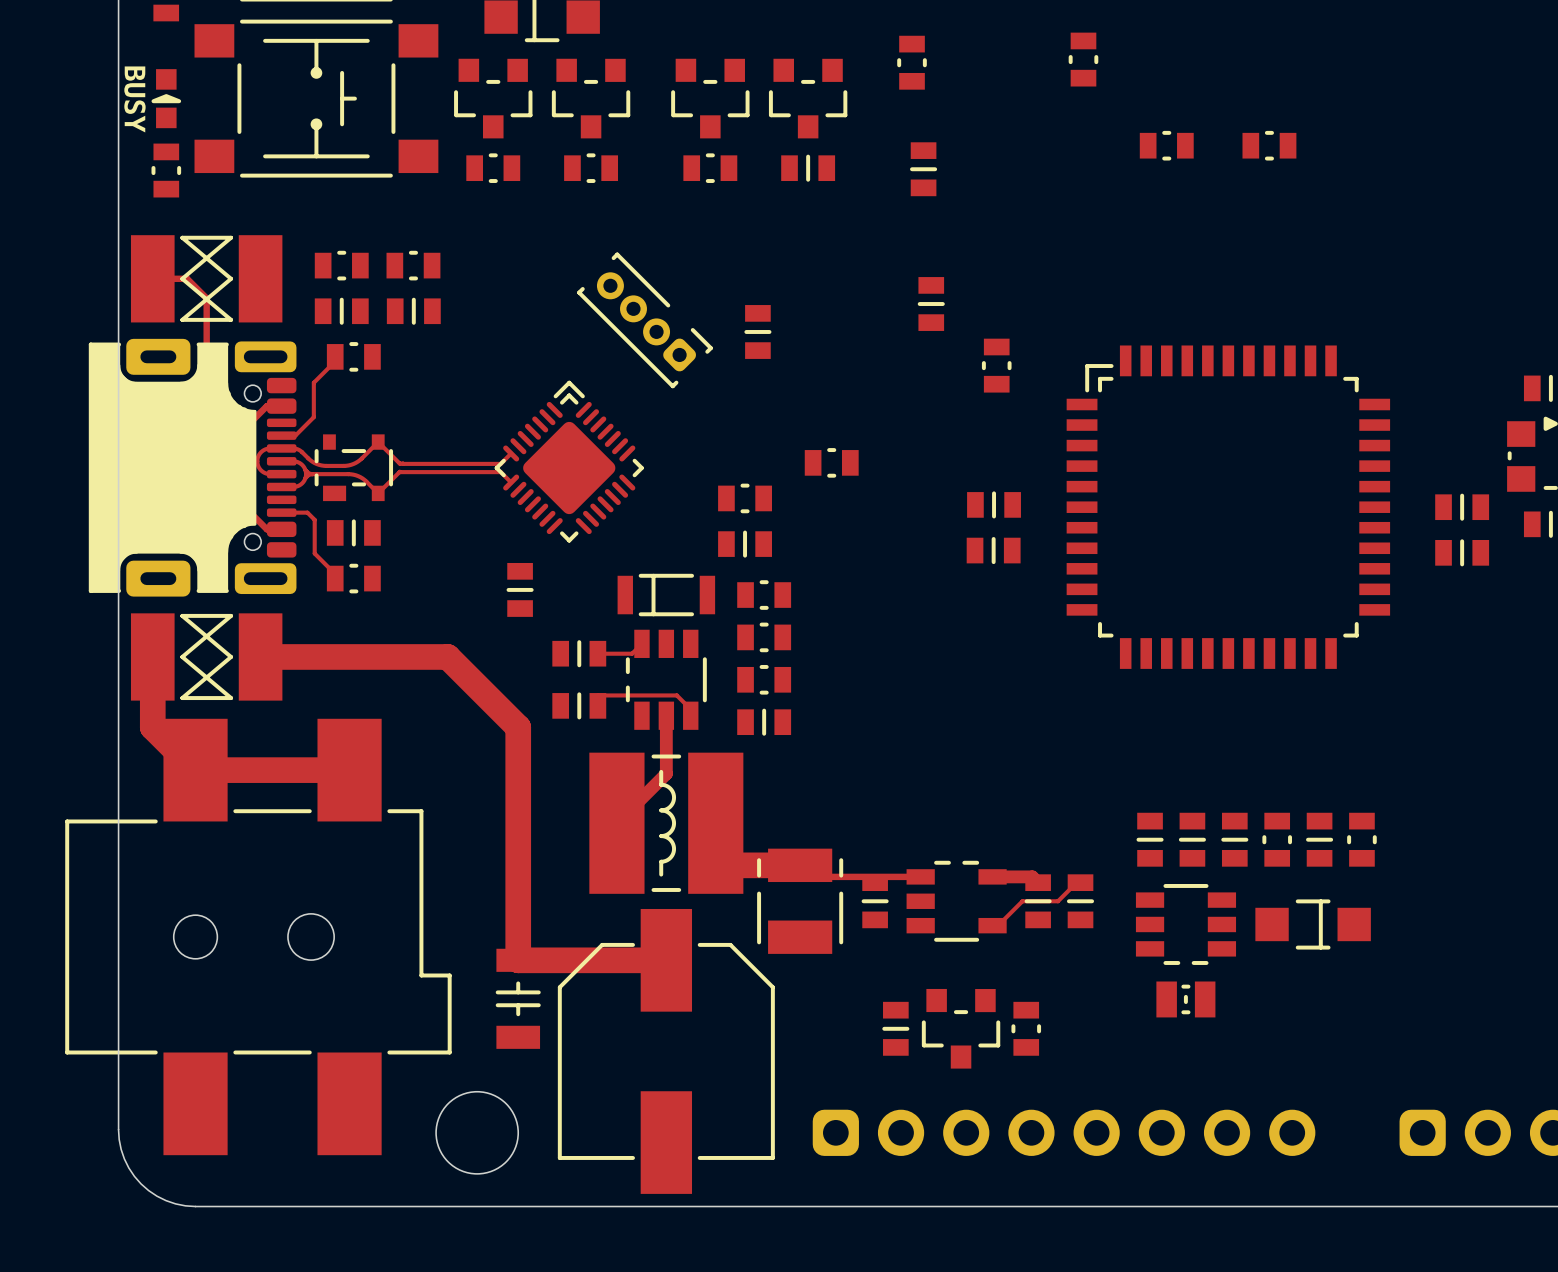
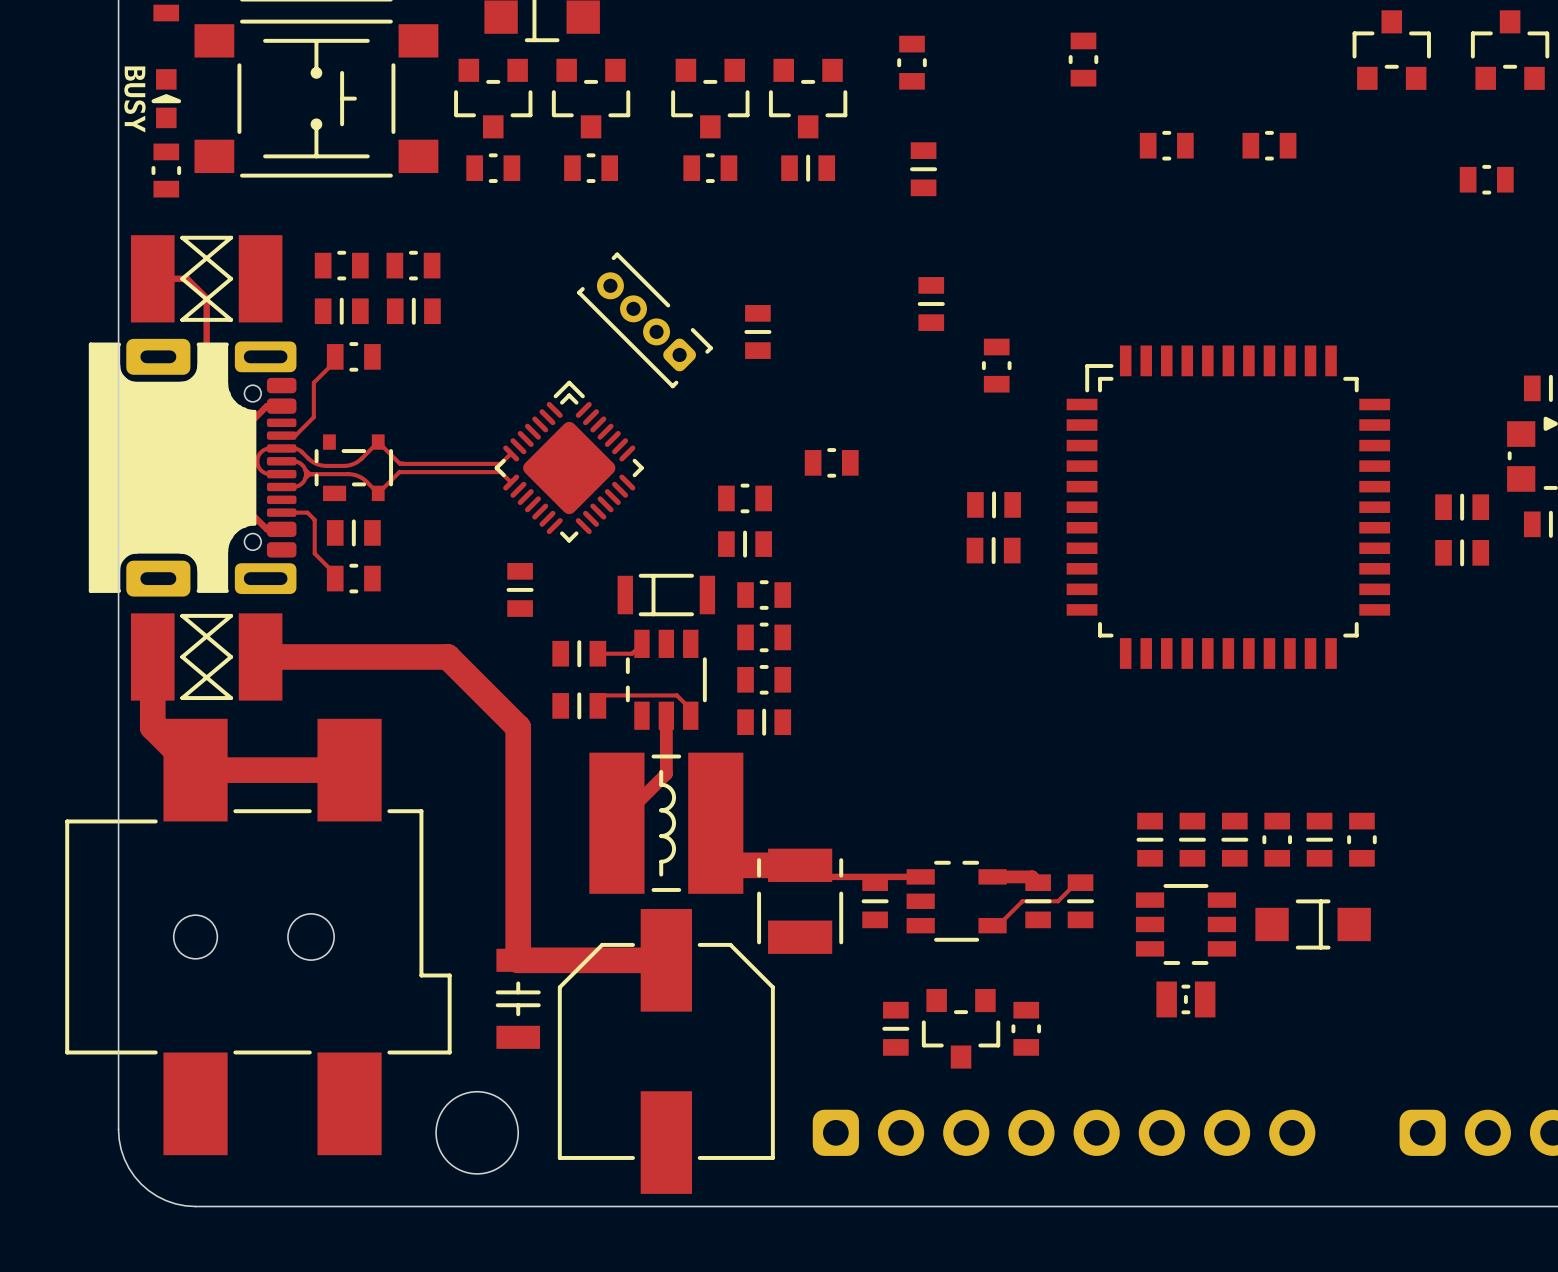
part: none -> (1391, 50)
part: none -> (1510, 50)
part: none -> (1486, 179)

